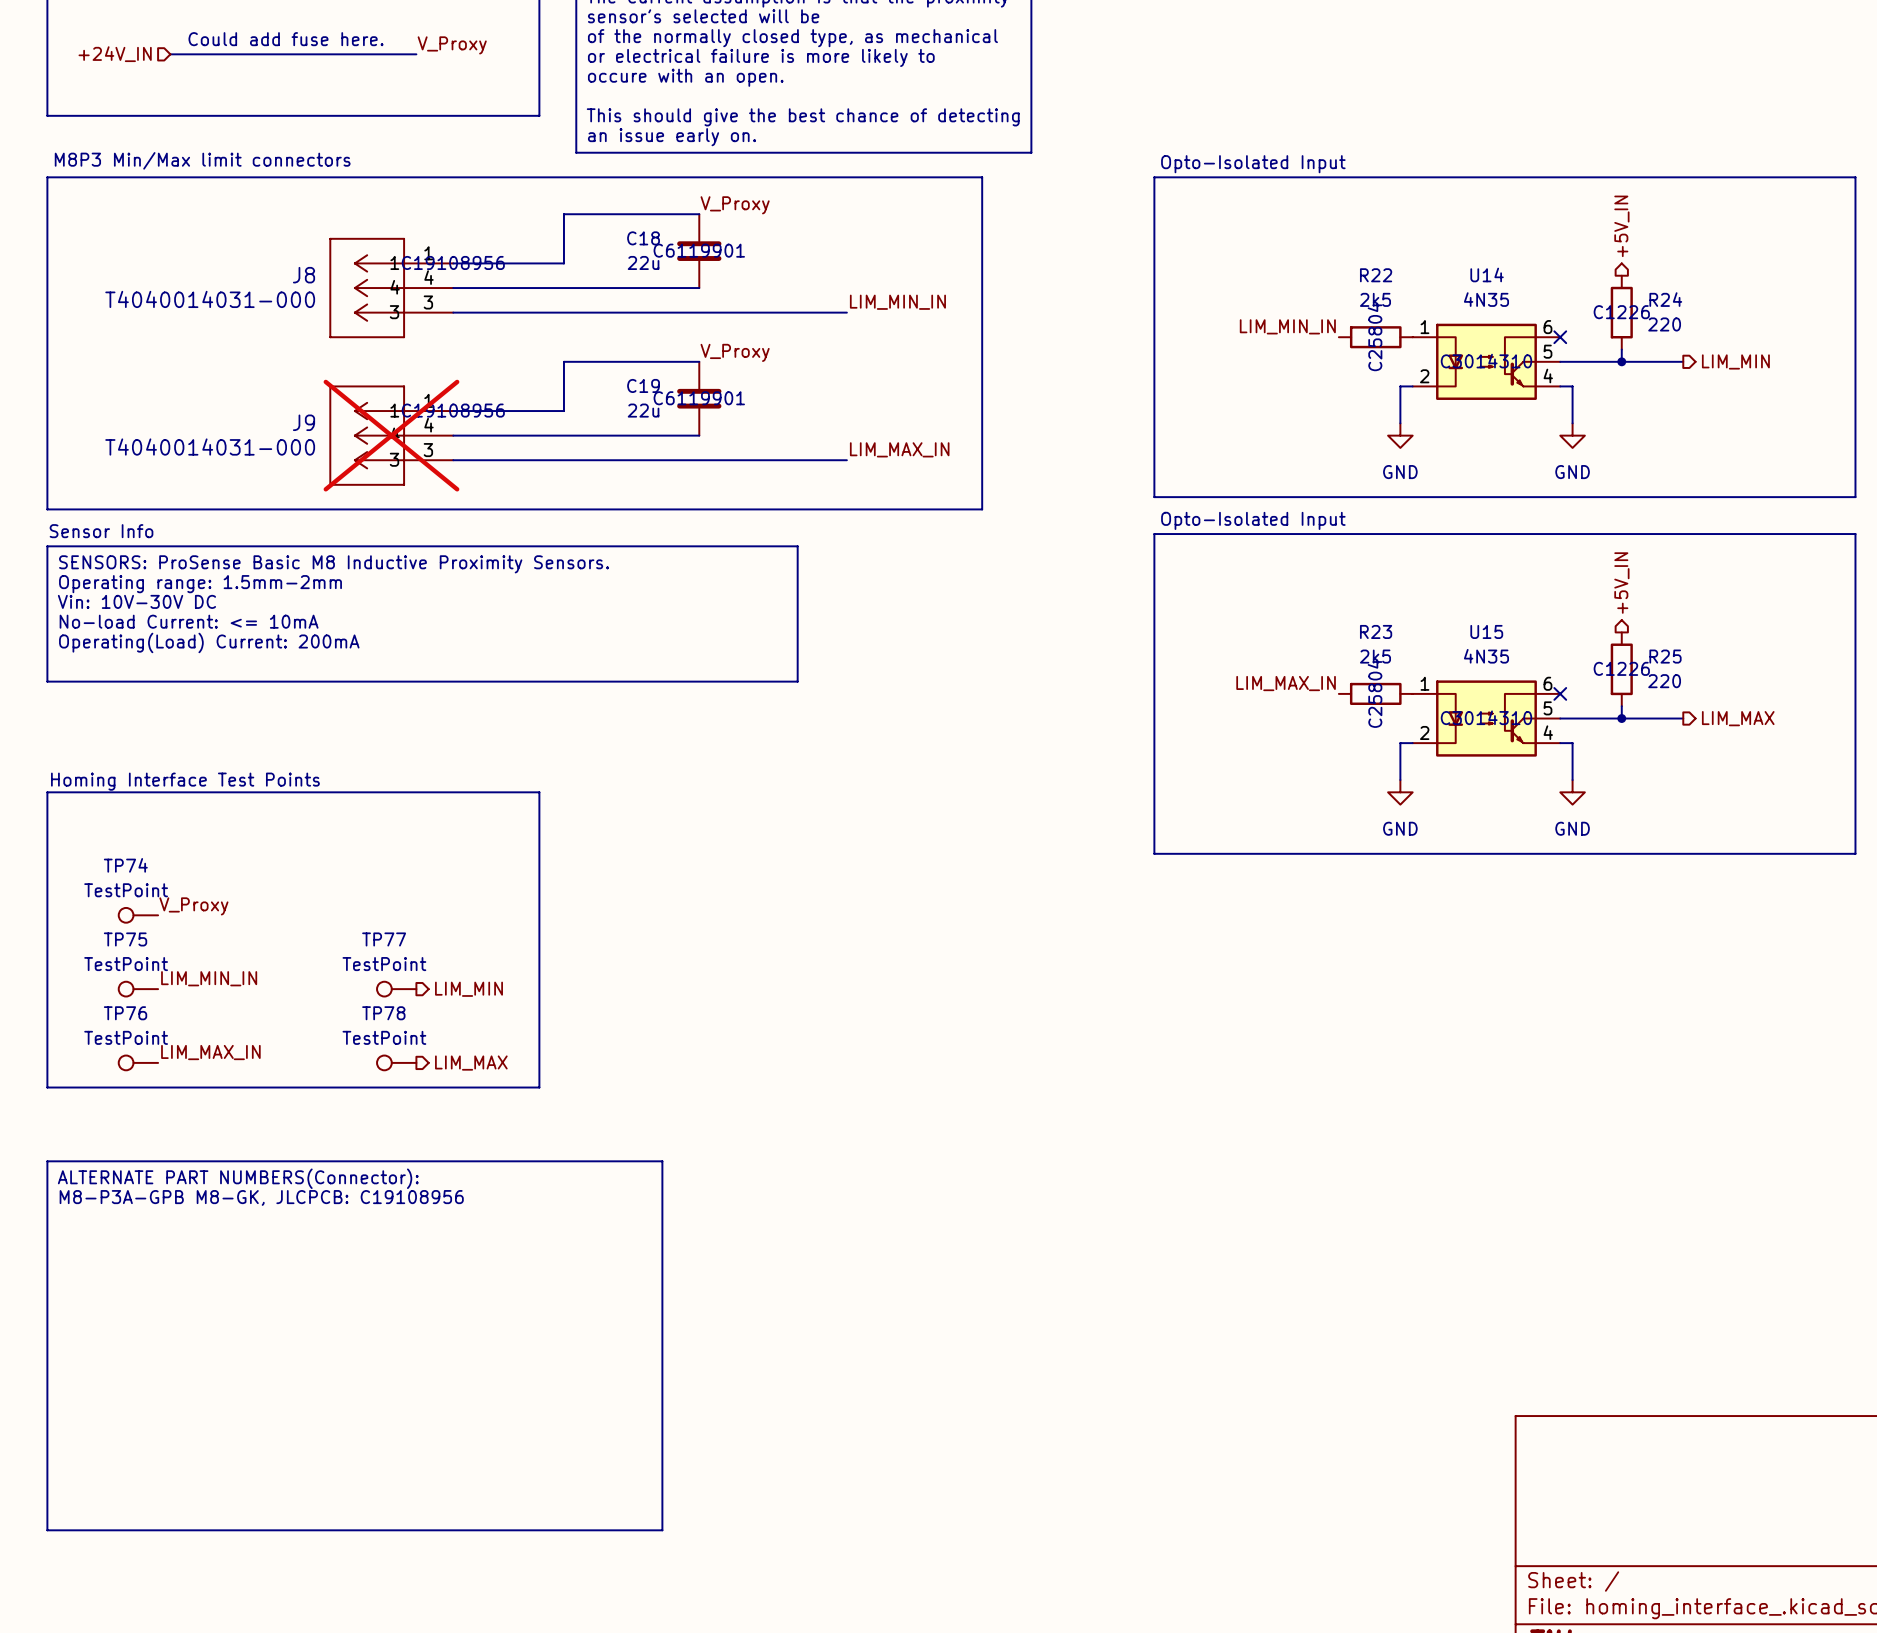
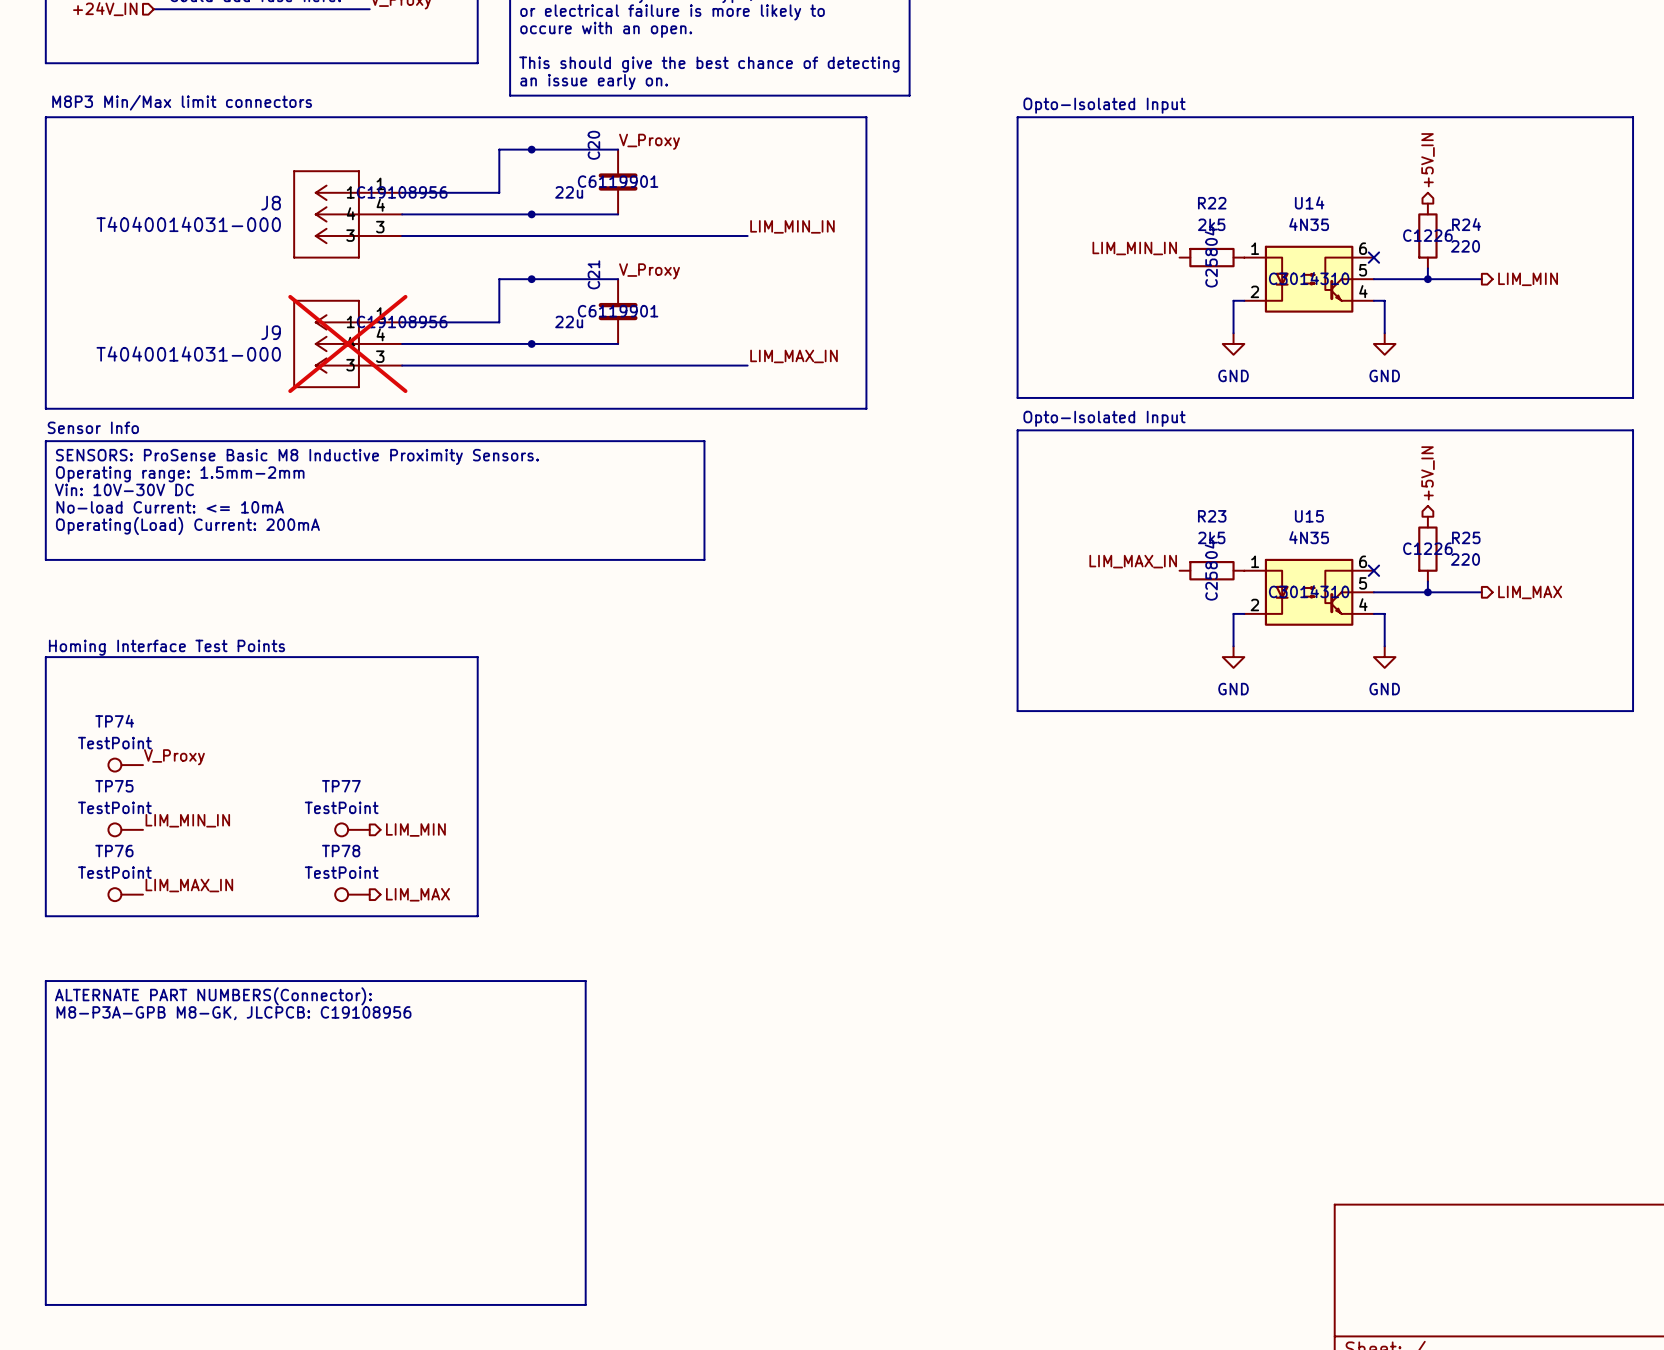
junction: none -> (531, 149)
C18 name: C18 (643, 238) -> C20 (593, 145)
junction: none -> (531, 214)
junction: none -> (531, 279)
C19 name: C19 (643, 385) -> C21 (593, 274)
junction: none -> (531, 343)

